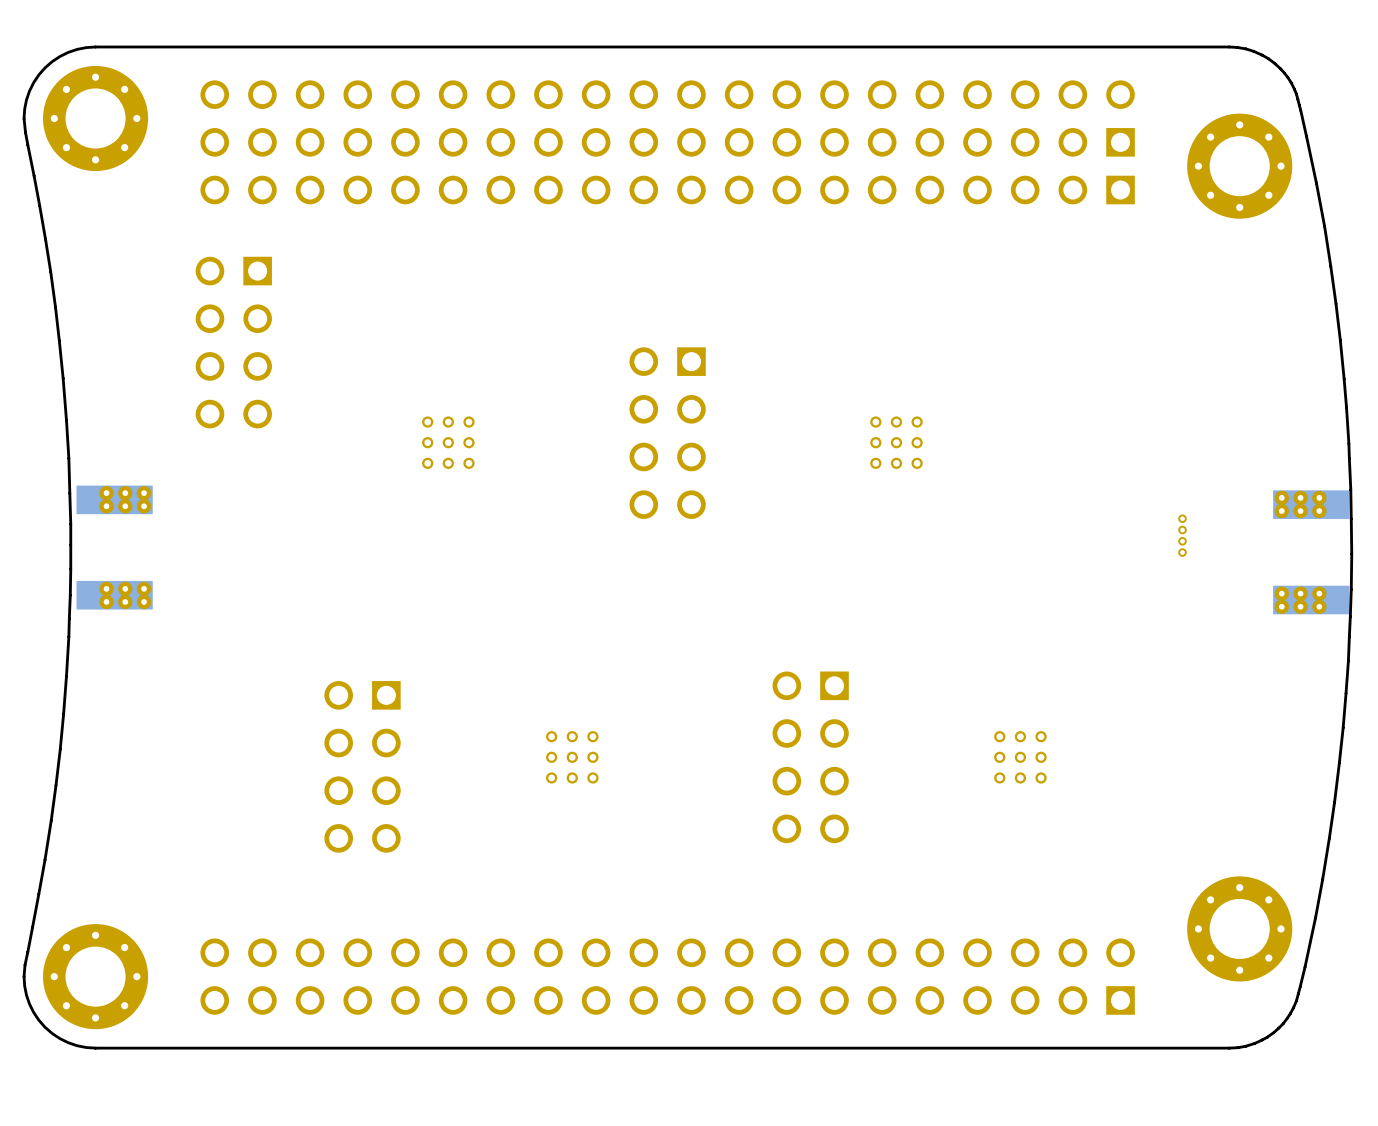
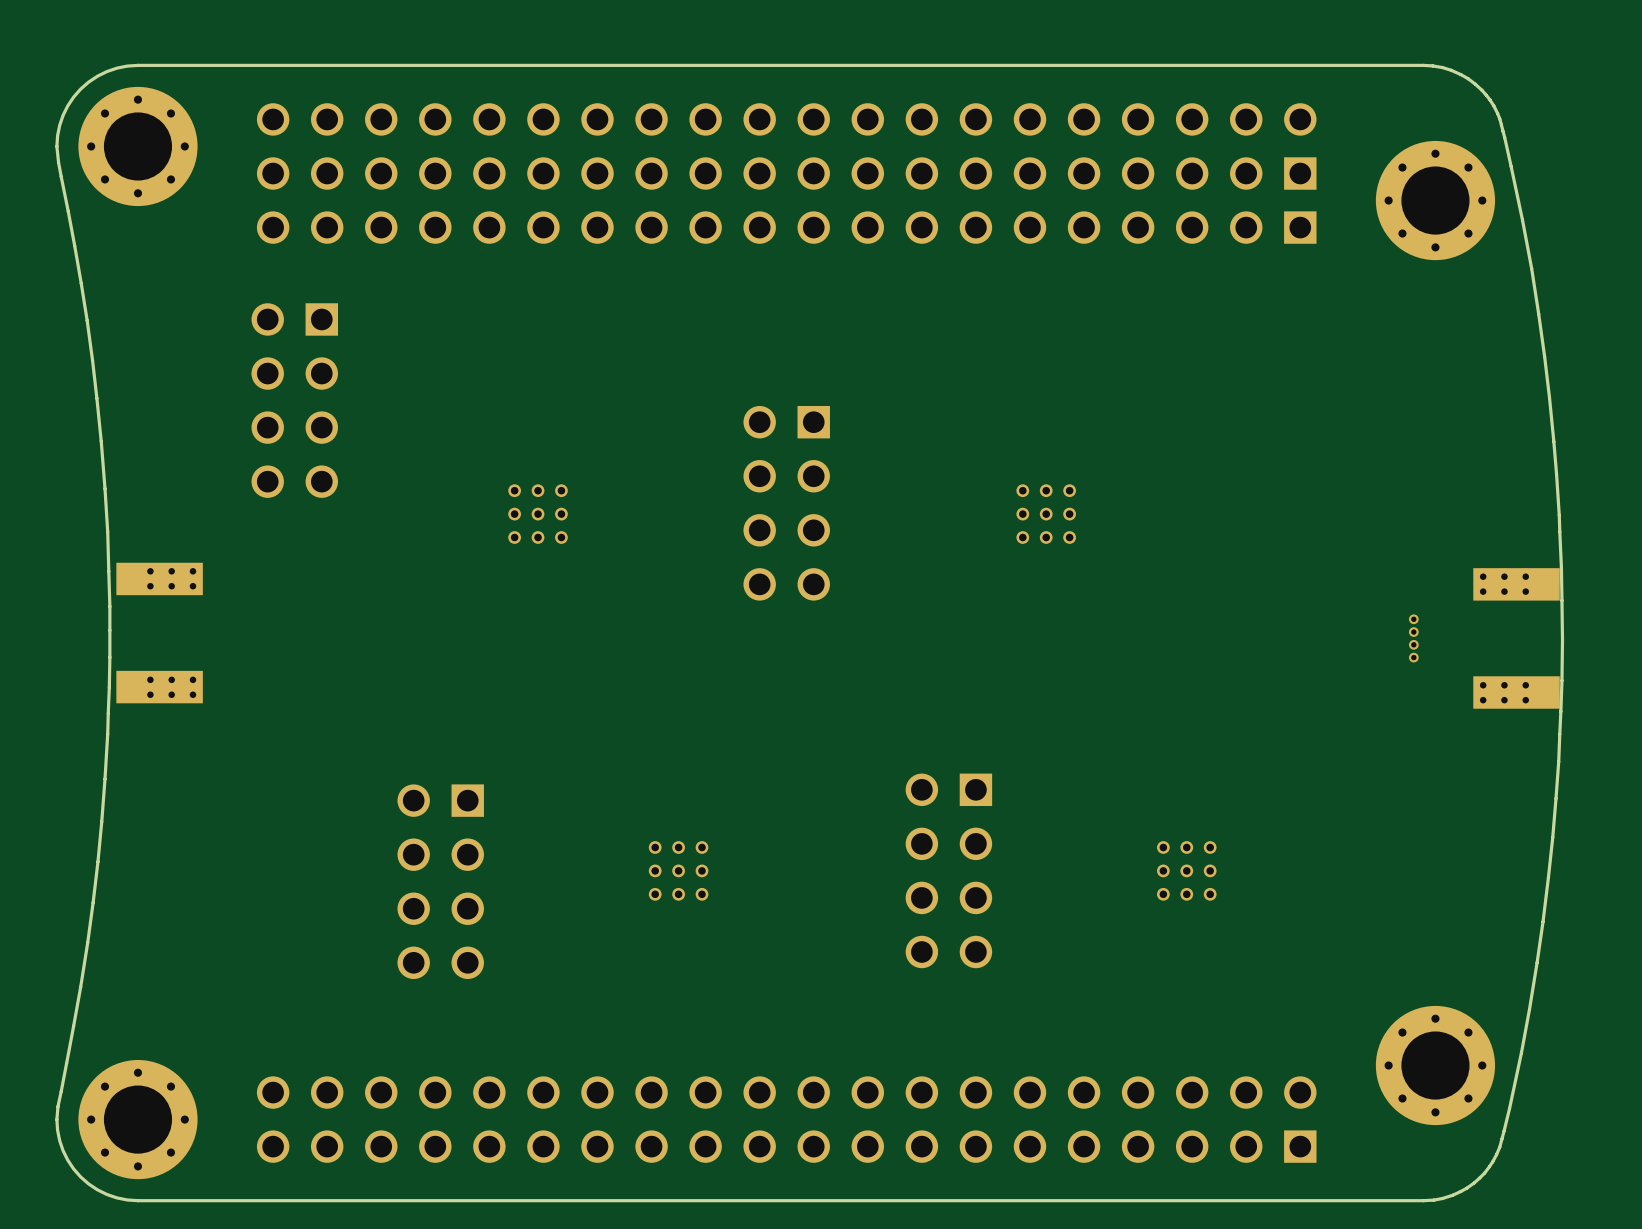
part position: (1182, 535) -> (1413, 638)

